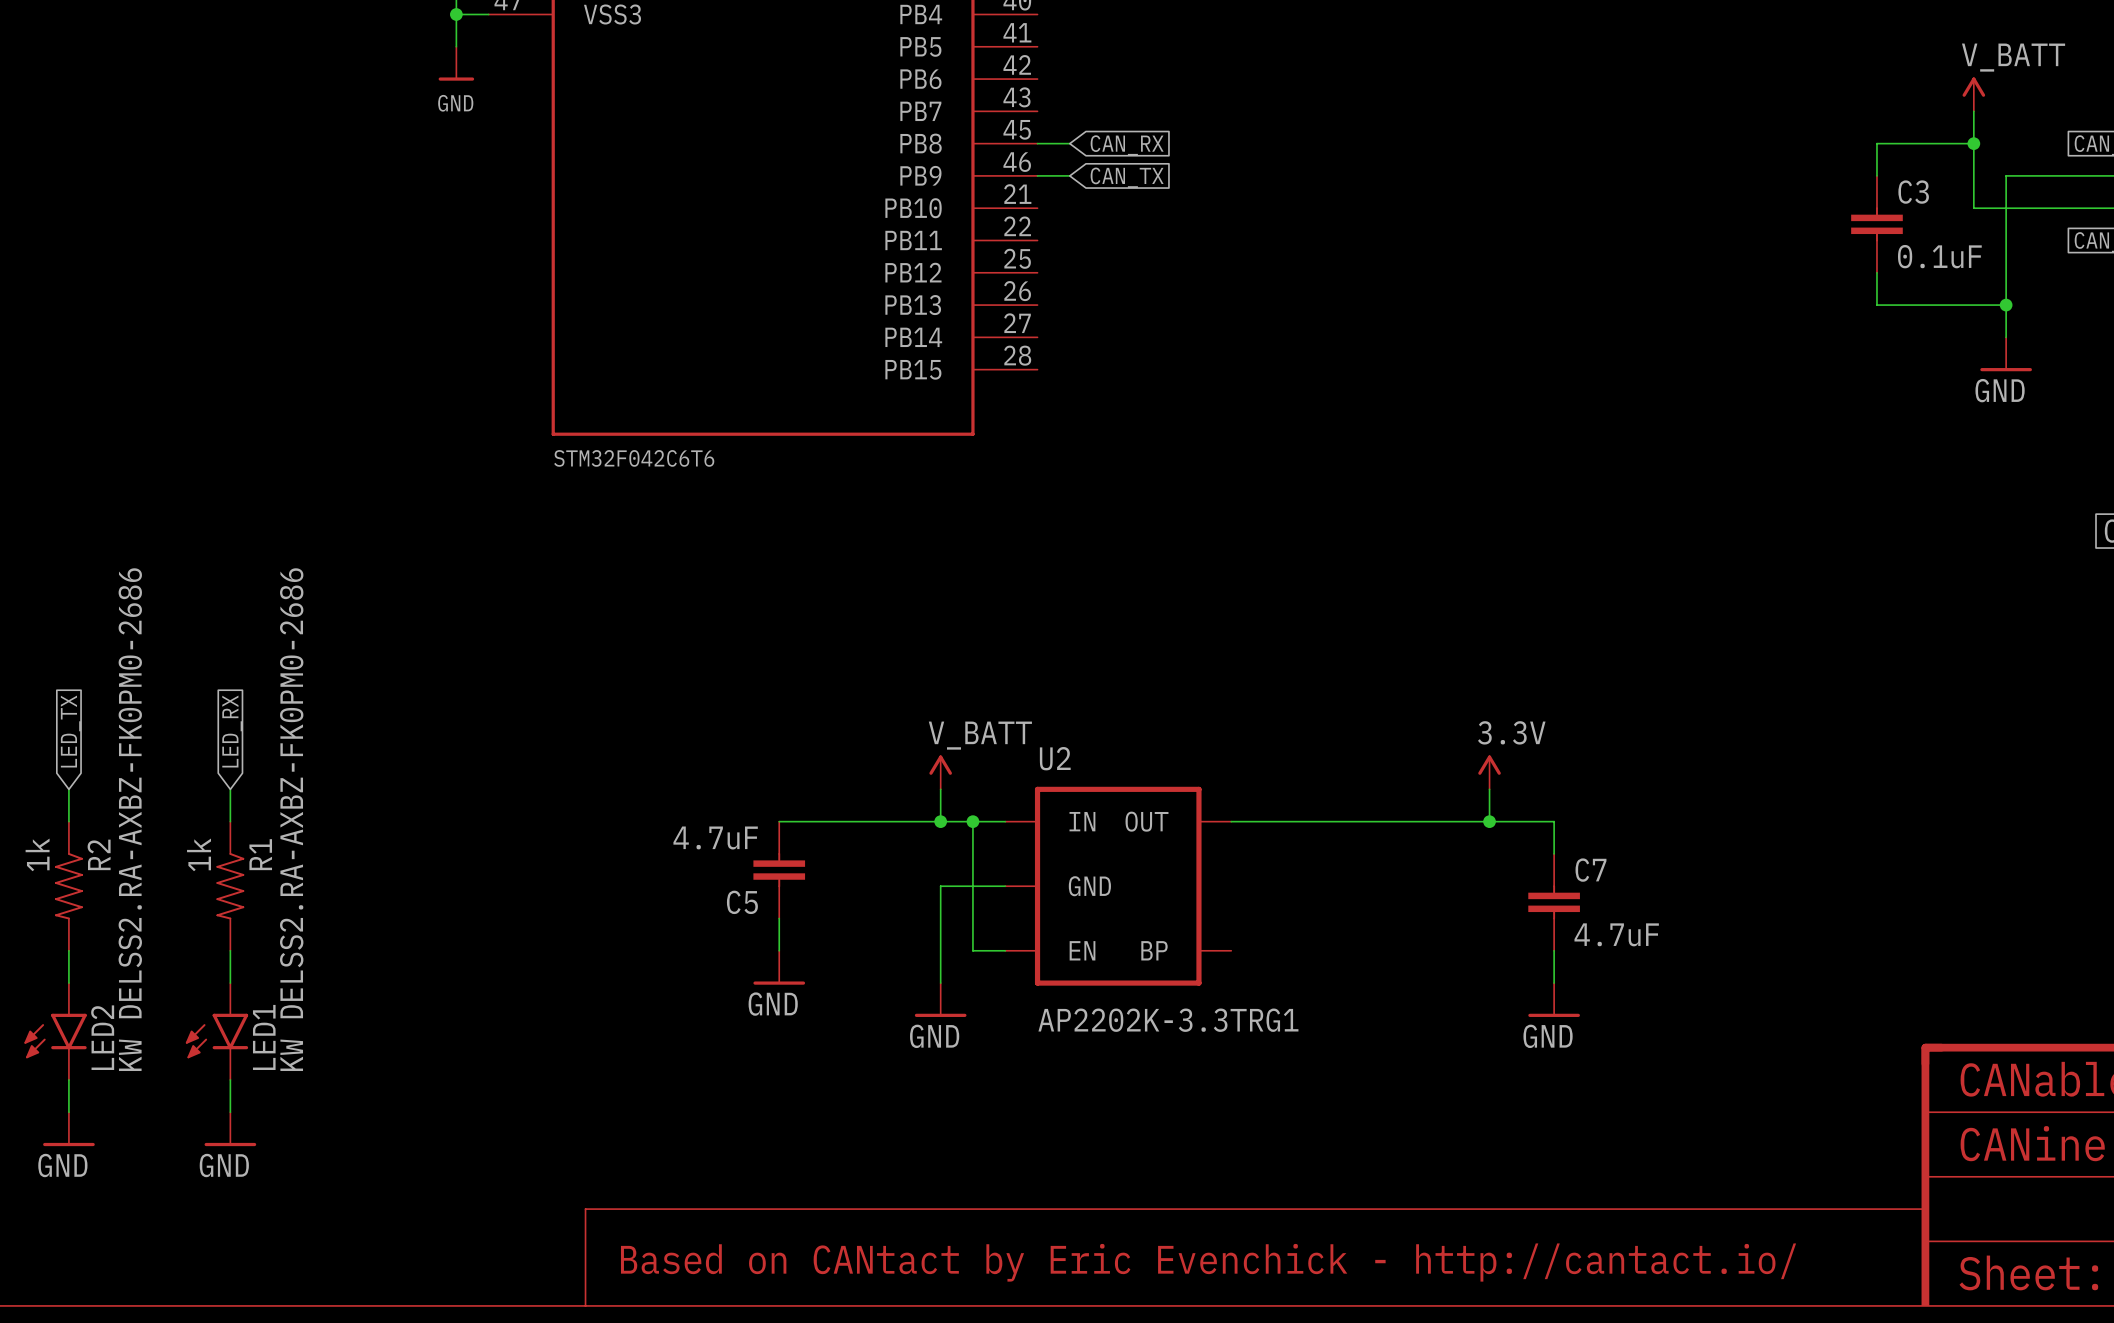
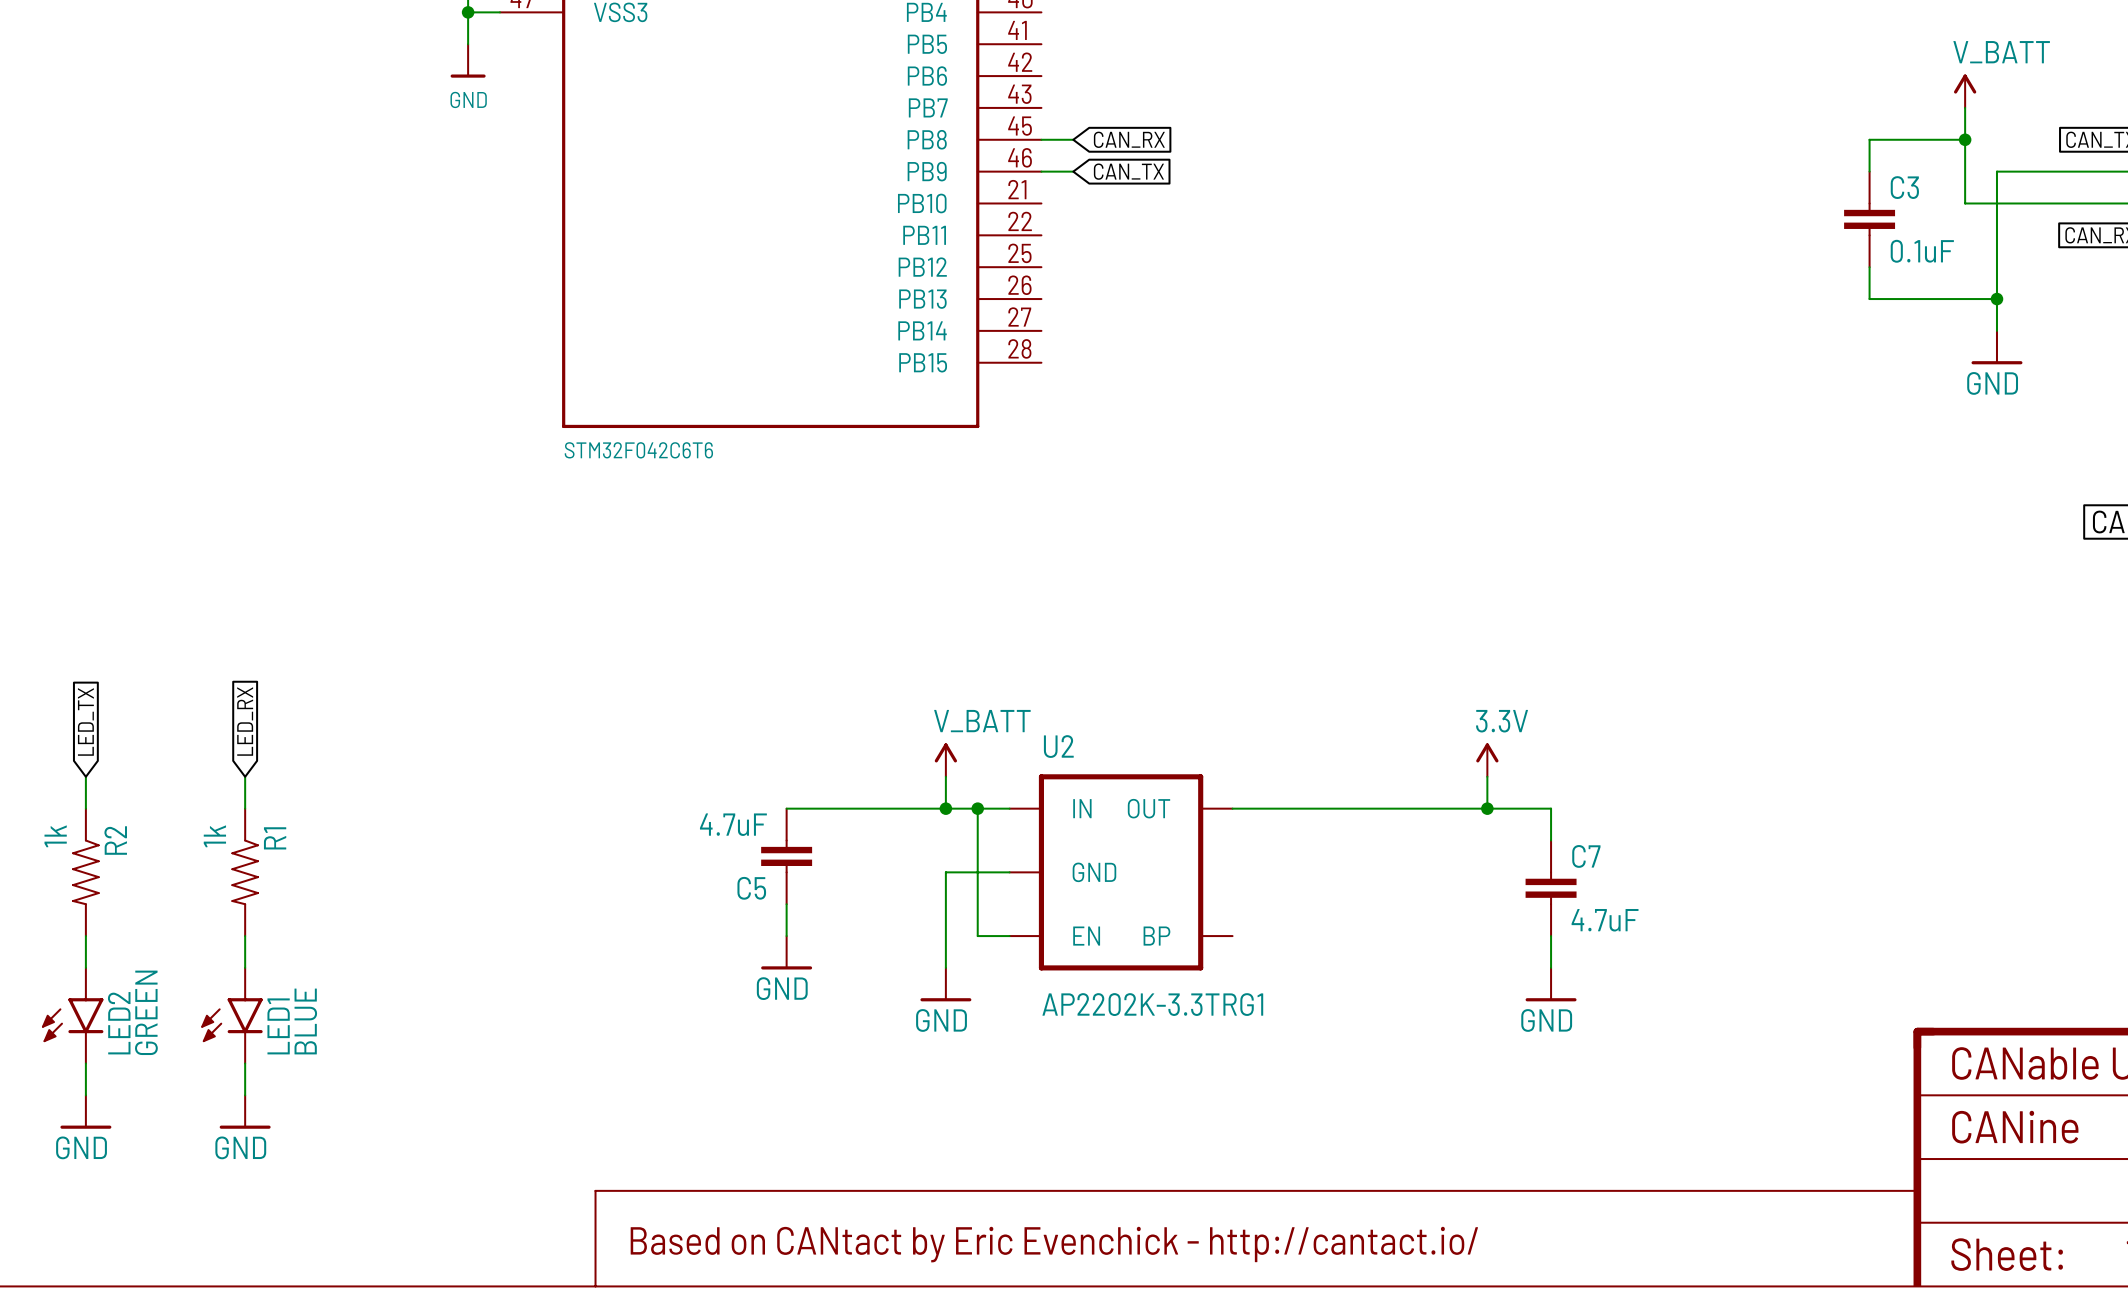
LED2 value: KW DELSS2.RA-AXBZ-FK0PM0-2686 (130, 819) -> GREEN (146, 1012)
LED1 value: KW DELSS2.RA-AXBZ-FK0PM0-2686 (291, 819) -> BLUE (305, 1021)

